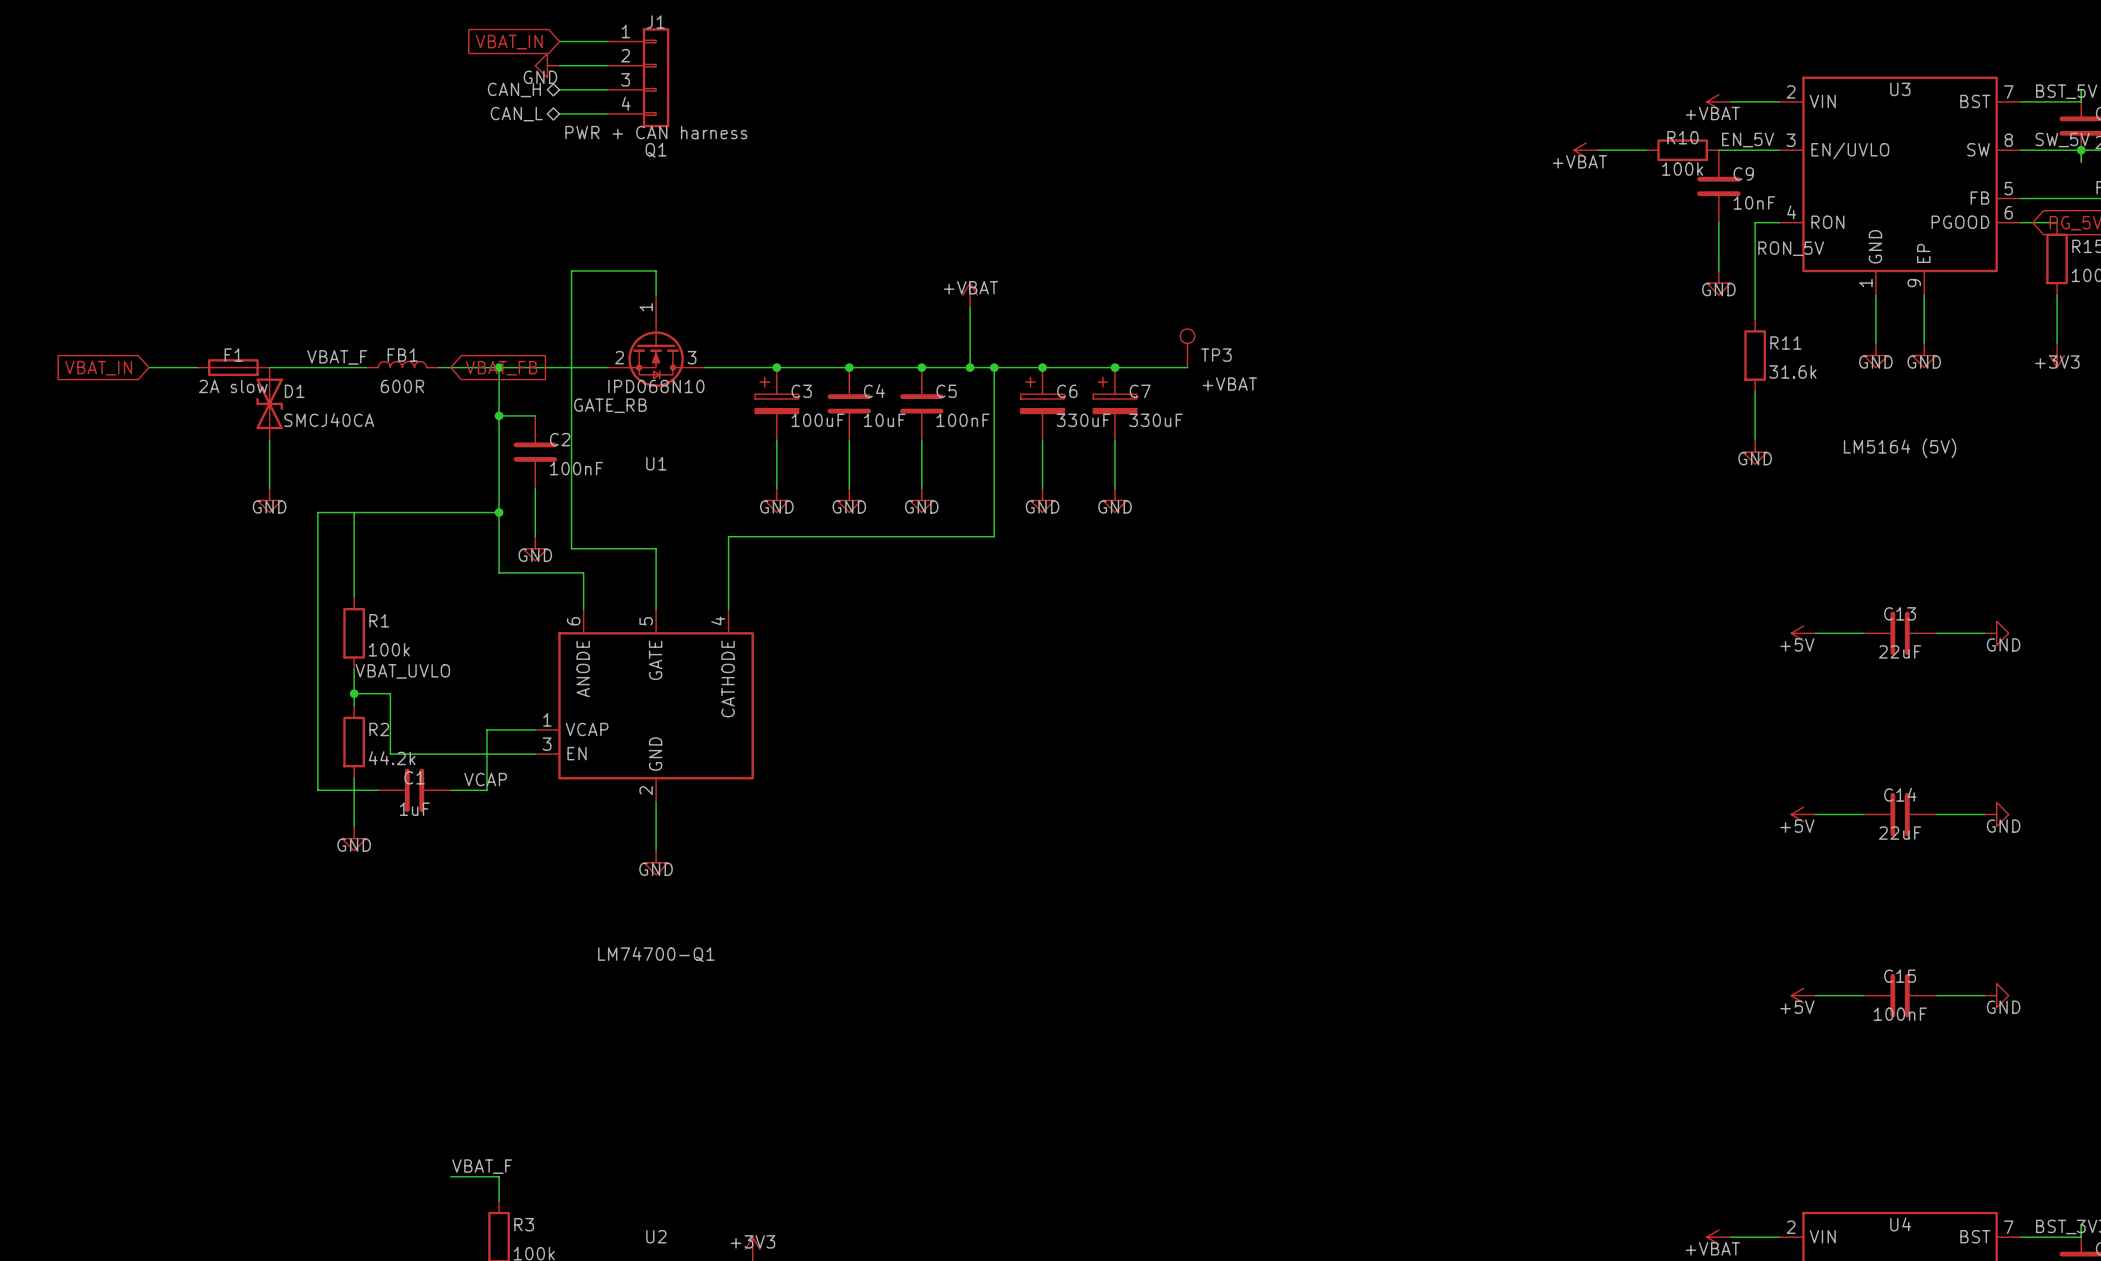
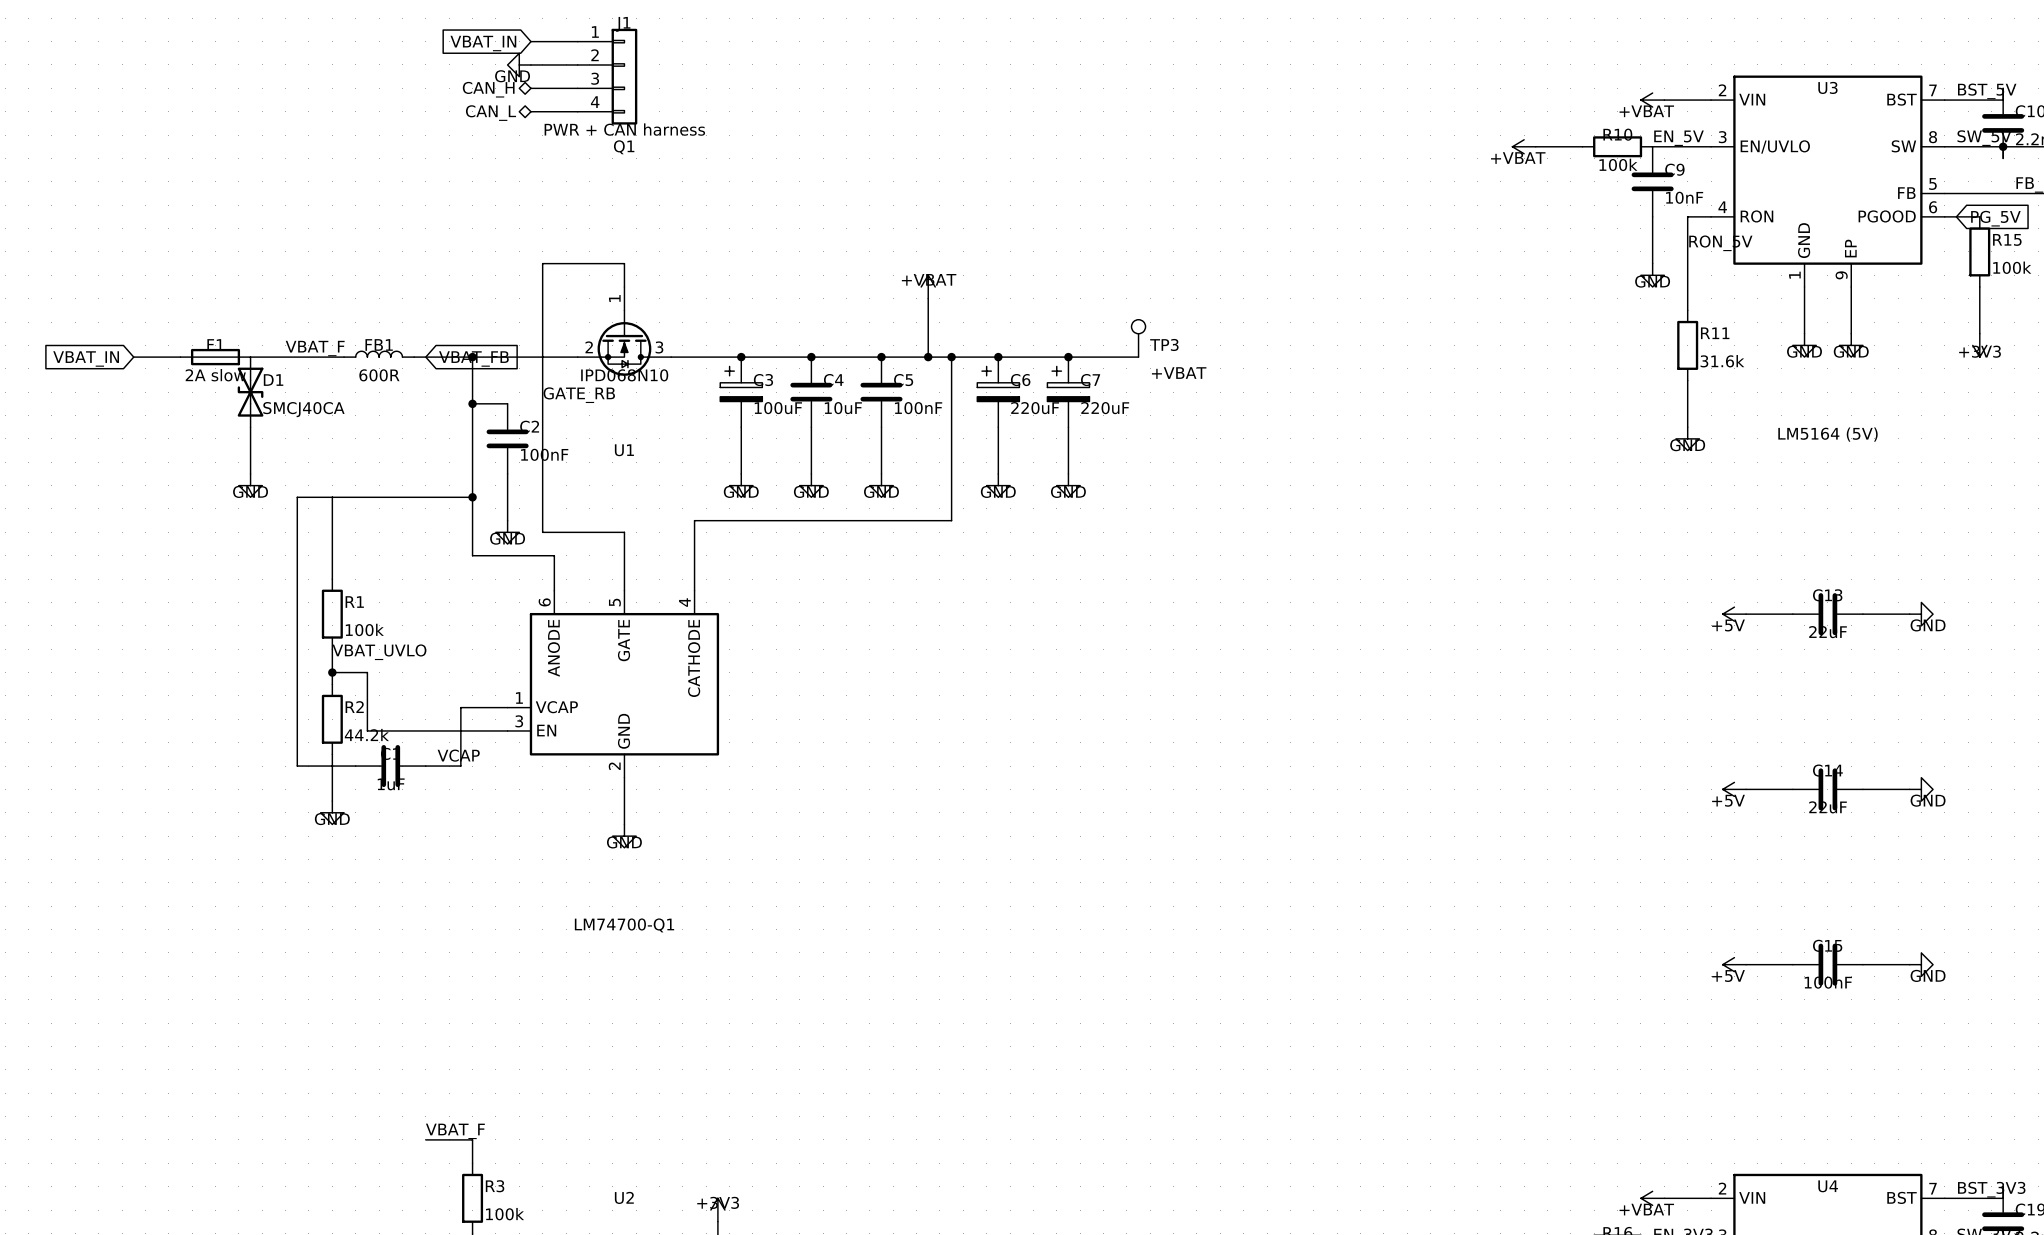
C6 value: 330uF (1083, 420) -> 220uF (1035, 408)
C7 value: 330uF (1155, 420) -> 220uF (1105, 408)

